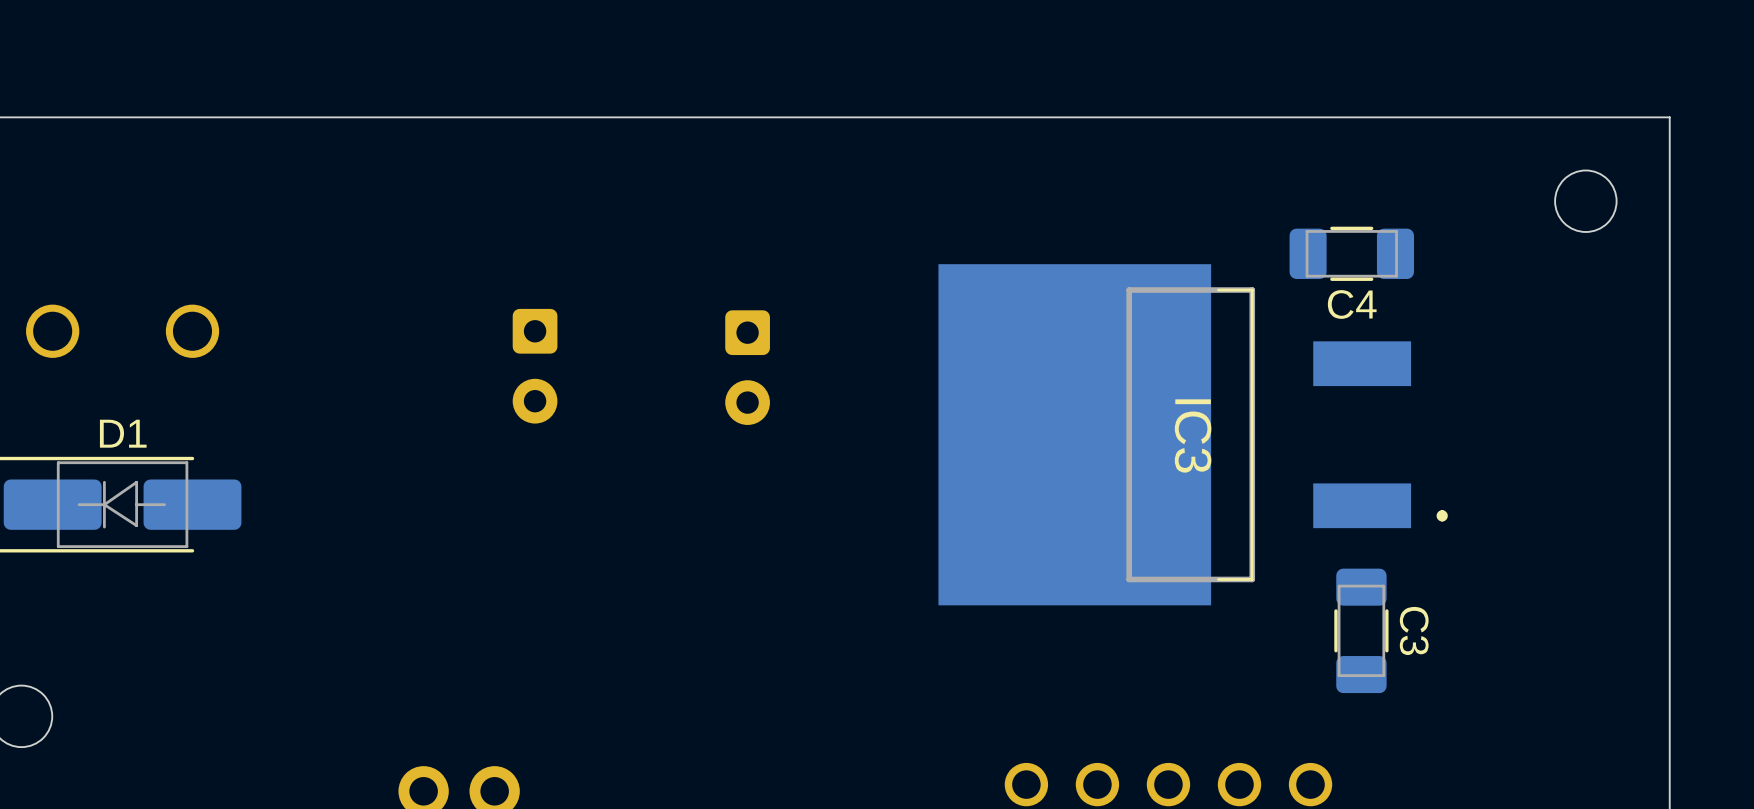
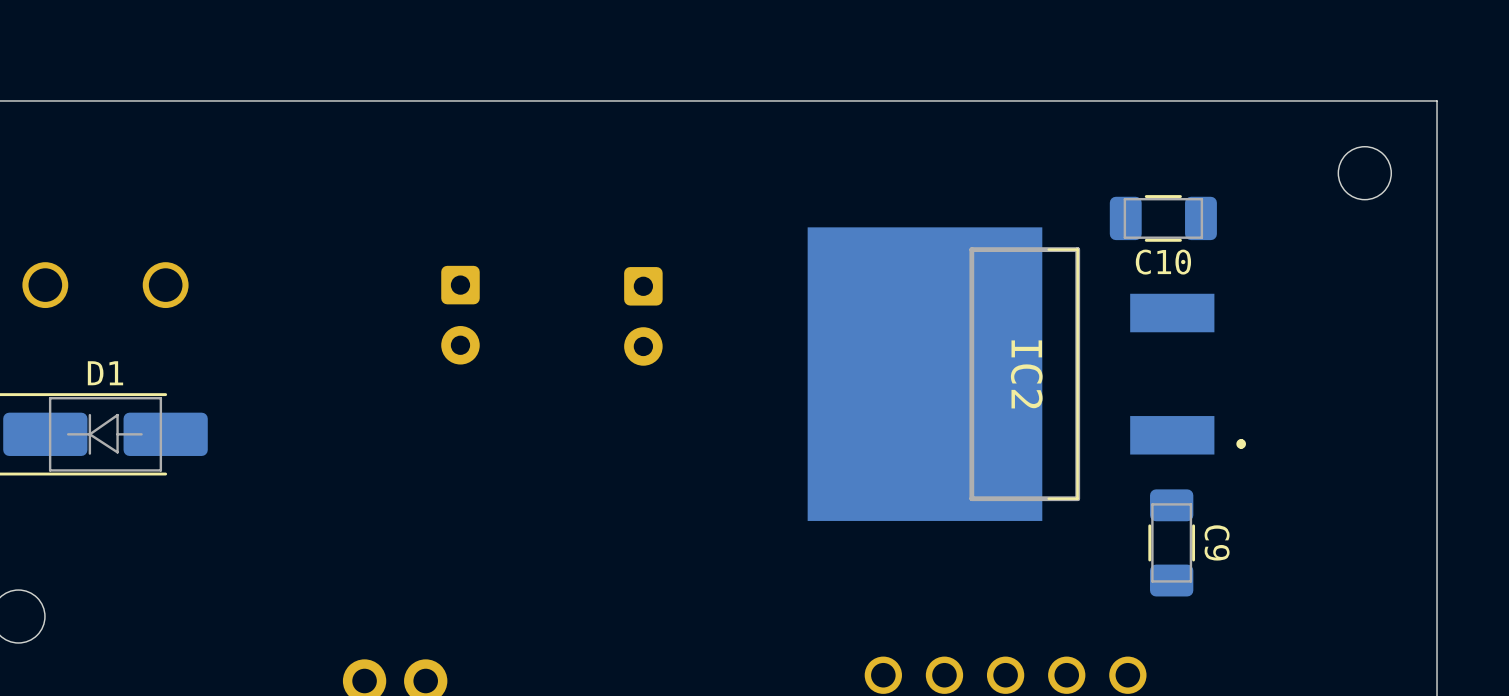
C4 name: C4 (1352, 304) -> C10 (1163, 262)
IC3 name: IC3 (1193, 435) -> IC2 (1026, 374)
C3 name: C3 (1414, 630) -> C9 (1217, 542)

